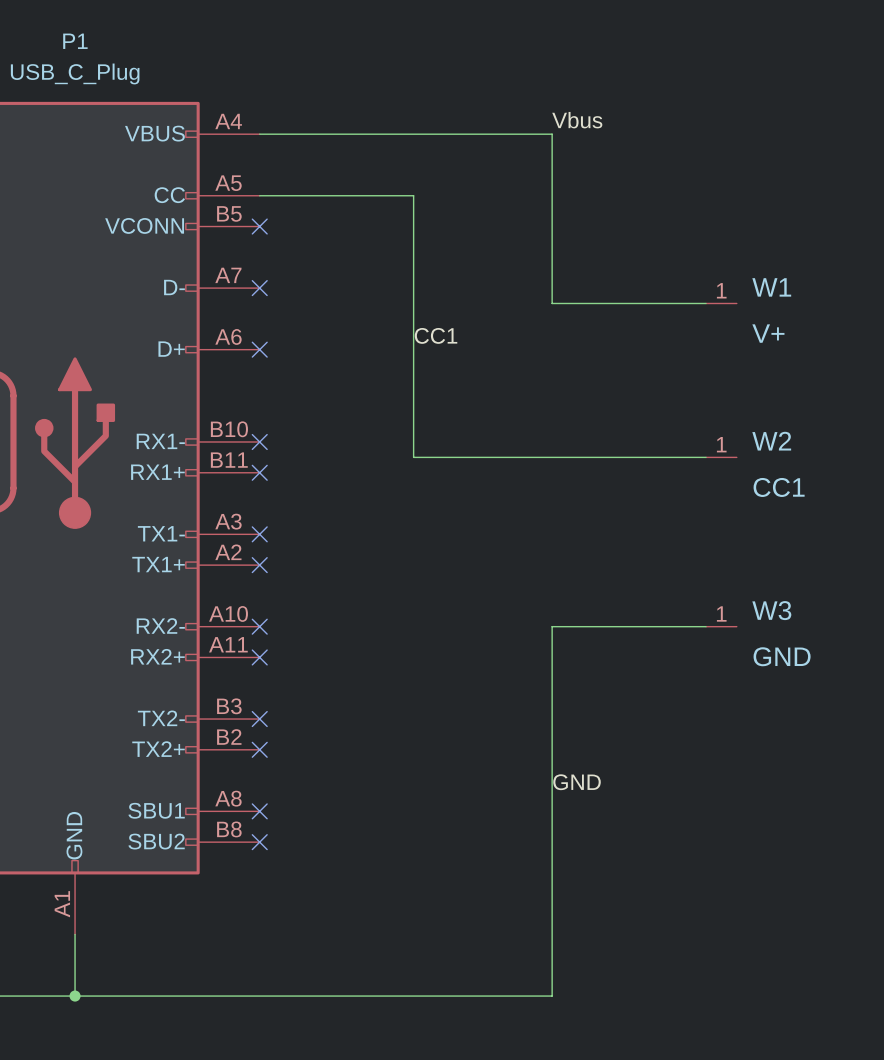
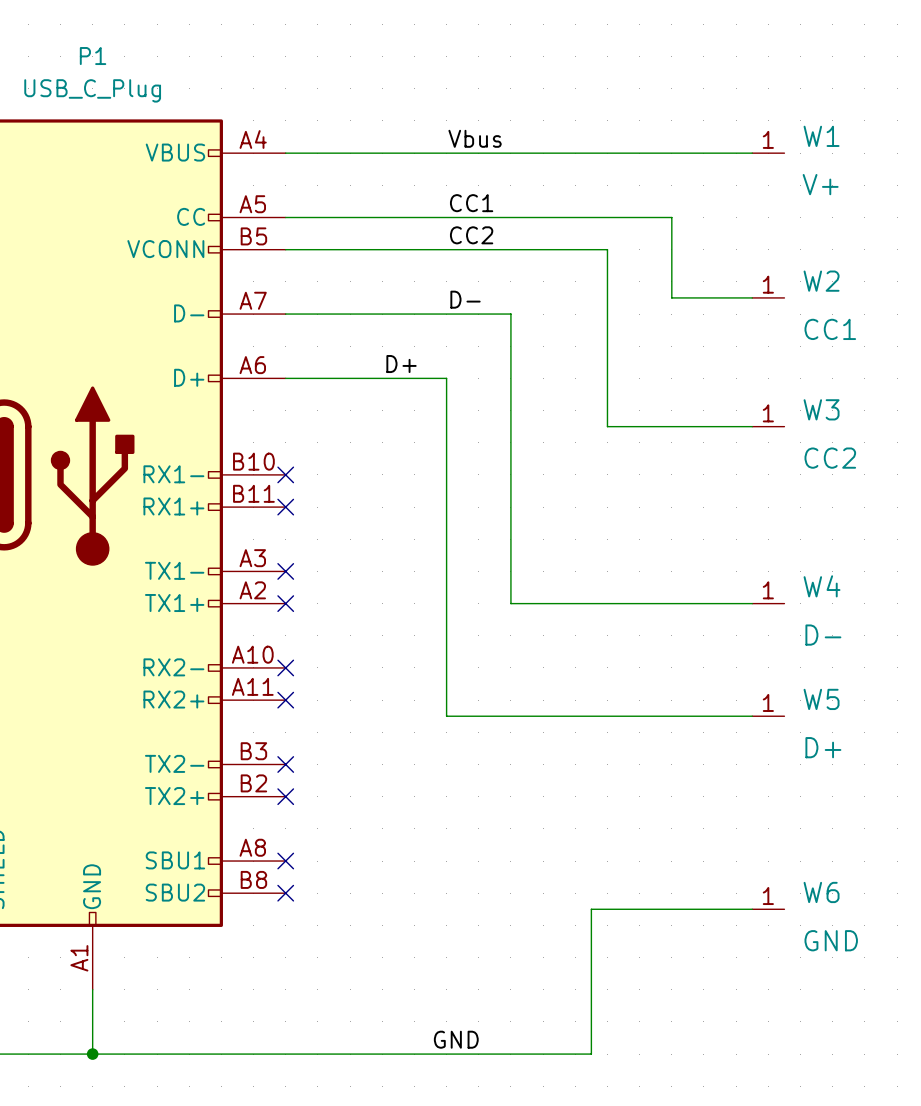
label position: Vbus (577, 120) -> Vbus (475, 138)
wire: (552, 134) (552, 303) (706, 303) -> (591, 153) (752, 153)
wire: (413, 195) (413, 349) -> (285, 378) (446, 378)
wire: none -> (446, 217) (671, 217) (671, 297) (752, 297)
label: none -> CC2 (471, 235)
wire: none -> (285, 249) (607, 249) (607, 426) (752, 426)
no-connect mark: (259, 226) -> none
label: none -> D- (465, 299)
wire: none -> (285, 314) (510, 314) (510, 603) (752, 603)
no-connect mark: (259, 288) -> none
W1 position: (721, 303) -> (768, 153)
label: none -> D+ (401, 364)
label position: CC1 (436, 335) -> CC1 (471, 203)
no-connect mark: (259, 349) -> none
wire: (413, 457) (706, 457) -> (446, 491) (446, 716) (752, 716)
W2 position: (721, 457) -> (768, 297)
W4: none -> D- (768, 603)
wire: (706, 626) (552, 626) (552, 857) -> (752, 909) (591, 909)
W3 position: (721, 626) -> (768, 426)
W3 value: GND (782, 656) -> CC2 (830, 458)
W5: none -> D+ (768, 716)
label position: GND (577, 782) -> GND (456, 1039)
W6: none -> GND (768, 909)

